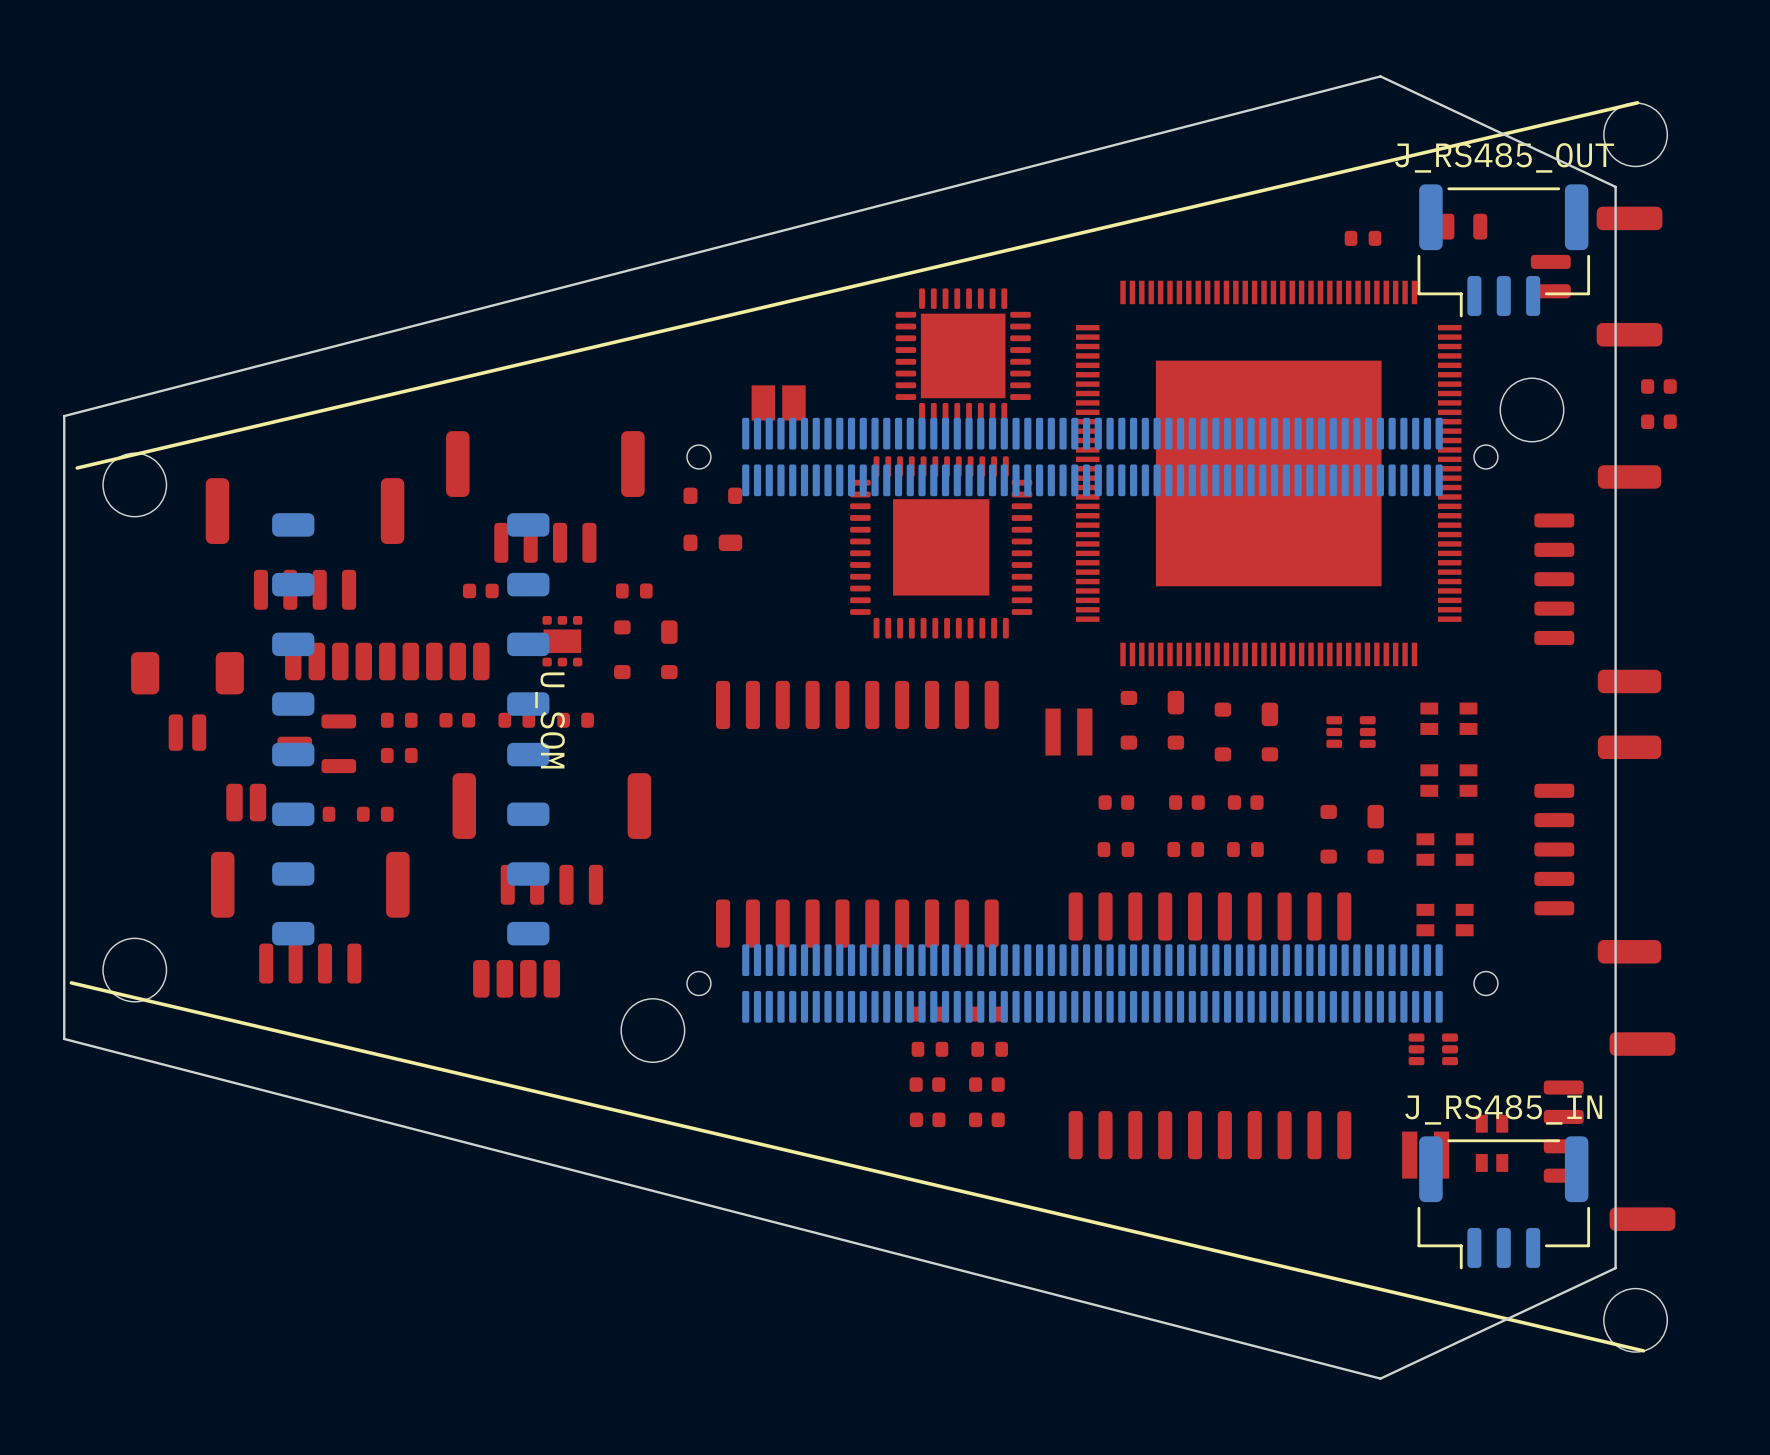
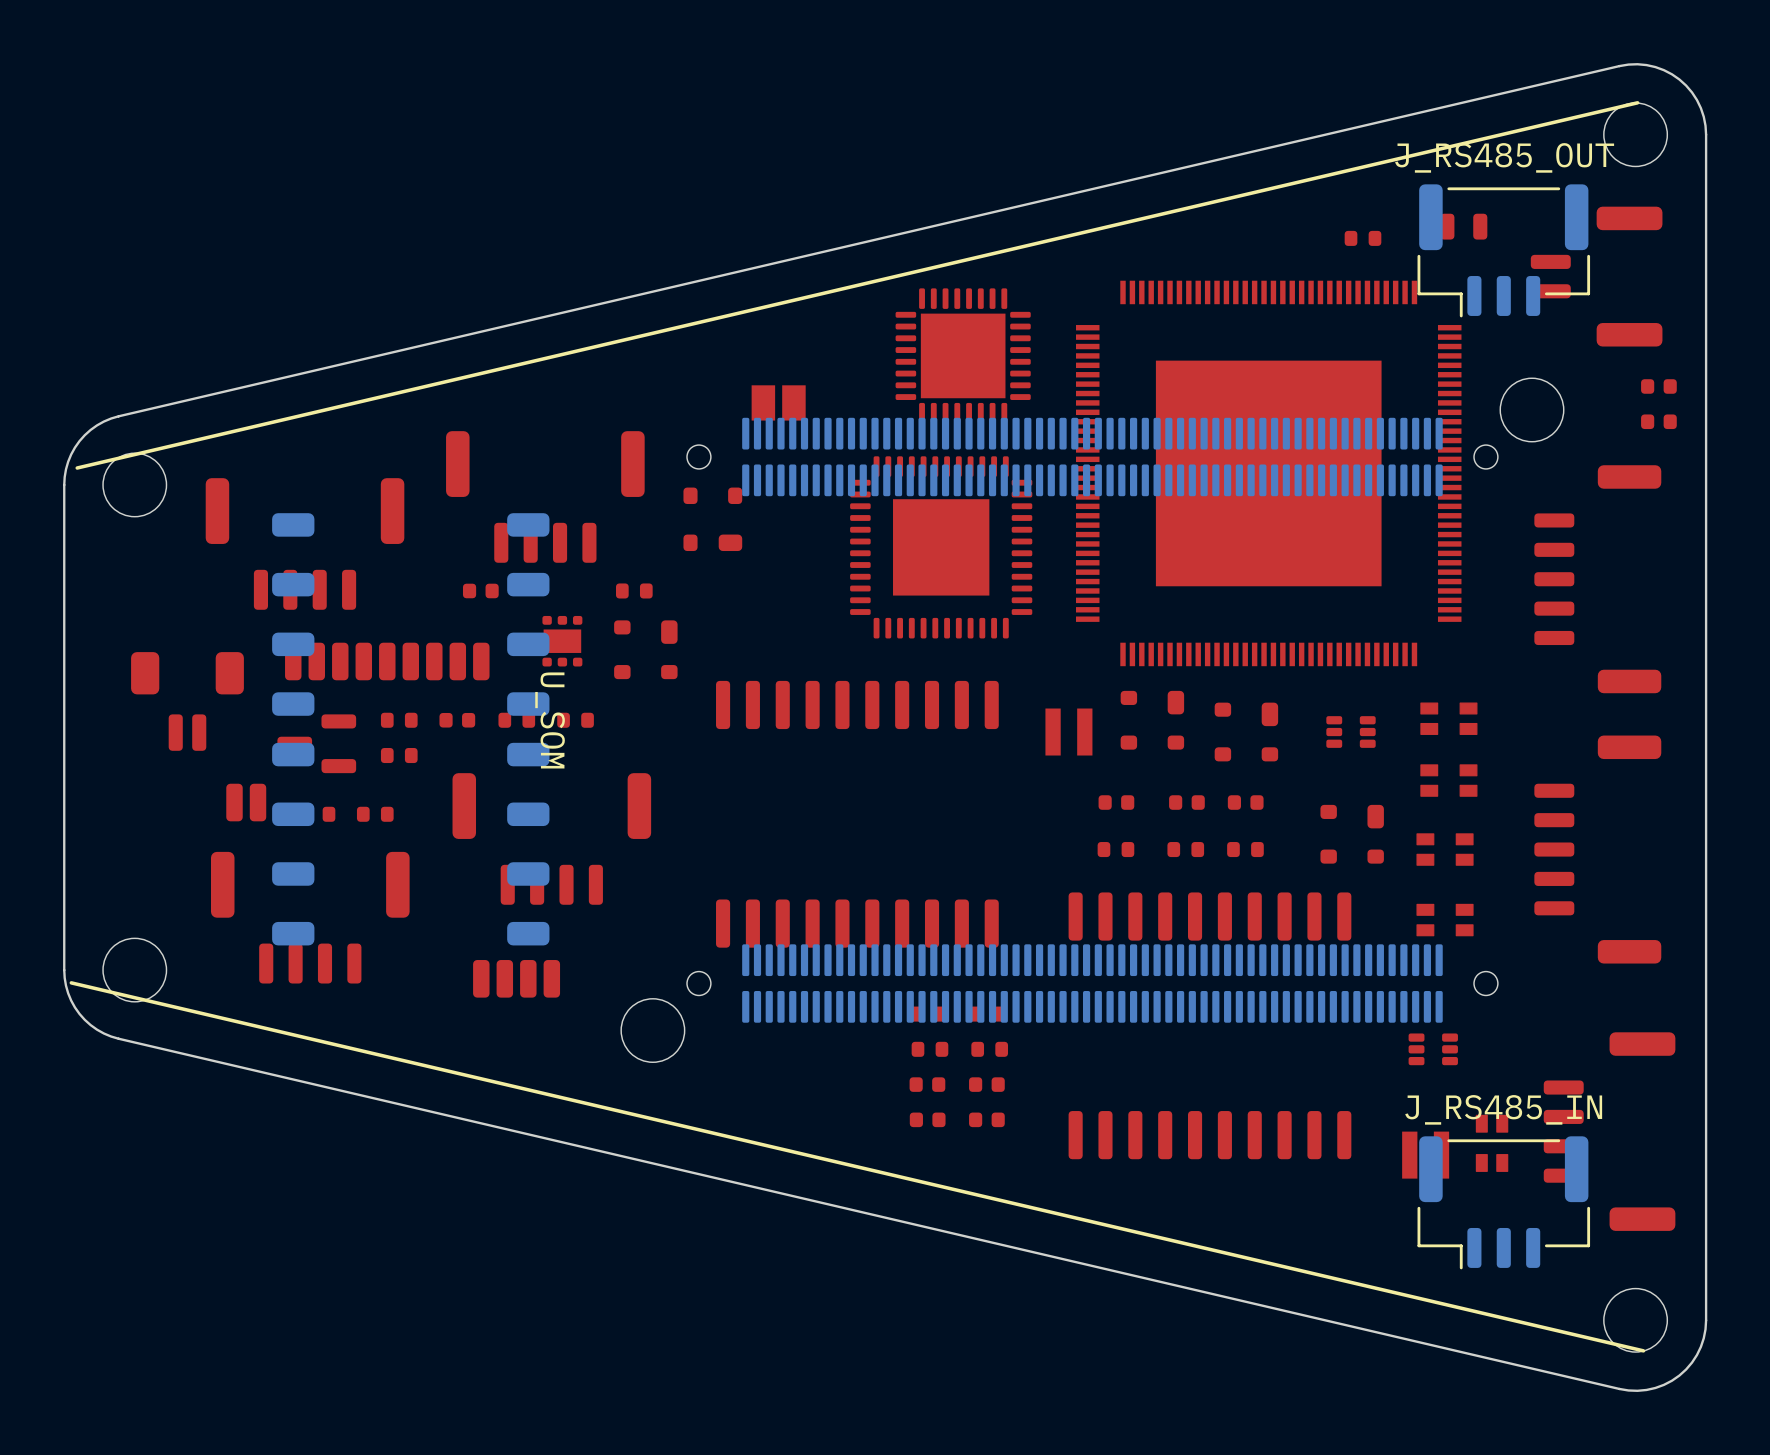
board edge: (64, 484) (64, 416) (1380, 76) (1615, 186) (1615, 1268) (1380, 1378) (64, 1038) (64, 970) -> (64, 484) (68, 461) (79, 441) (97, 425) (118, 416) (1619, 66) (1646, 65) (1671, 74) (1692, 92) (1703, 116) (1706, 134) (1706, 1320) (1703, 1338) (1696, 1355) (1686, 1369) (1671, 1380) (1646, 1389) (1619, 1388) (118, 1038) (97, 1029) (79, 1013) (68, 993) (64, 970)

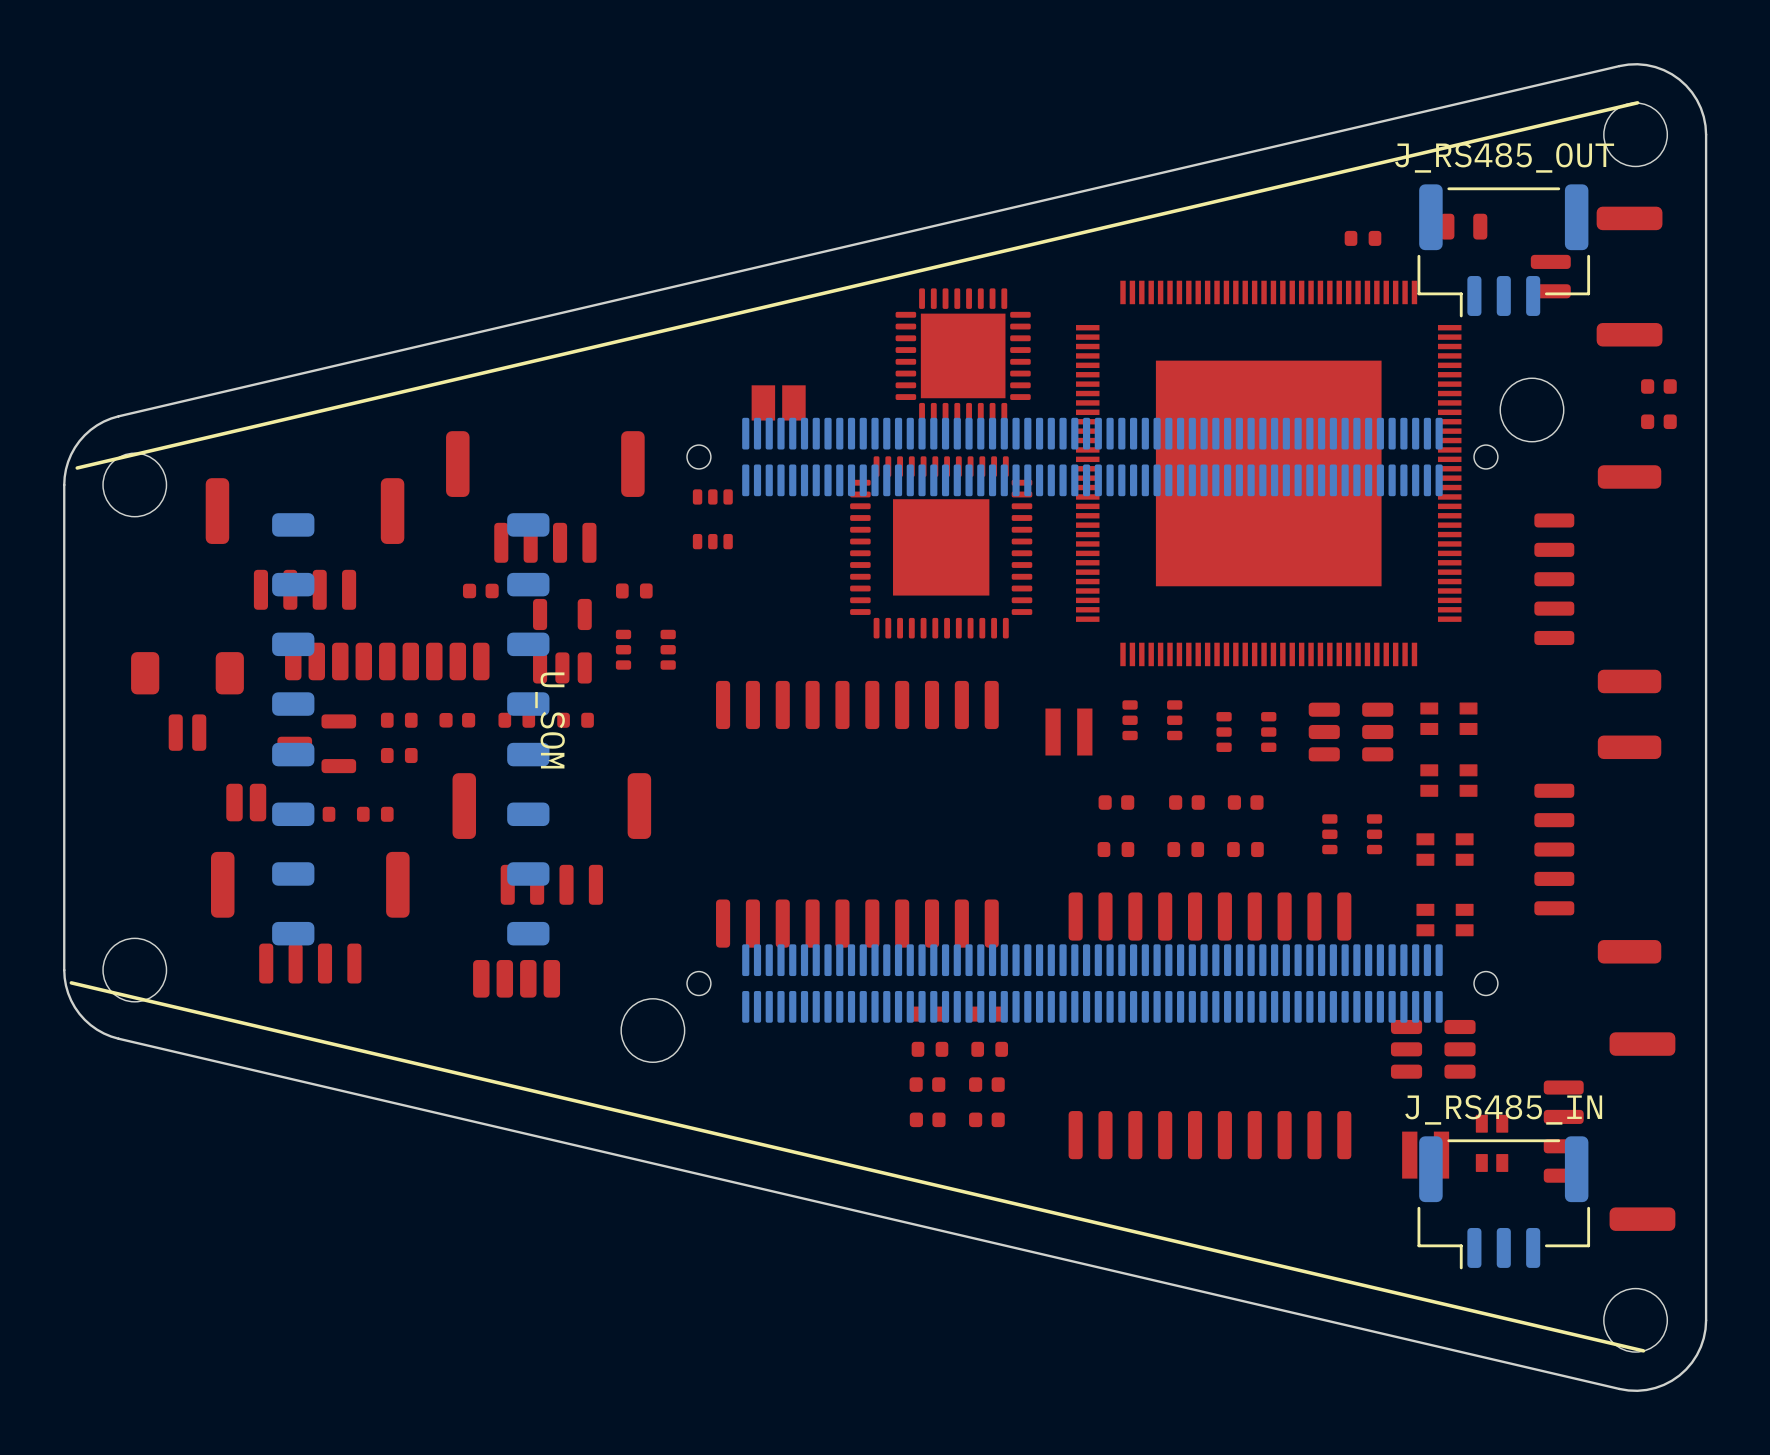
part footprint: [683, 487, 743, 552] -> [692, 489, 733, 550]
part footprint: [542, 615, 583, 667] -> [533, 598, 592, 684]
part footprint: [614, 620, 678, 680] -> [615, 629, 676, 670]
part footprint: [1120, 690, 1185, 750] -> [1122, 700, 1183, 741]
part footprint: [1214, 702, 1279, 762] -> [1216, 712, 1277, 752]
part footprint: [1326, 716, 1376, 748] -> [1308, 702, 1394, 762]
part footprint: [1320, 804, 1384, 864] -> [1322, 814, 1383, 855]
part footprint: [1408, 1033, 1458, 1066] -> [1390, 1019, 1476, 1079]

